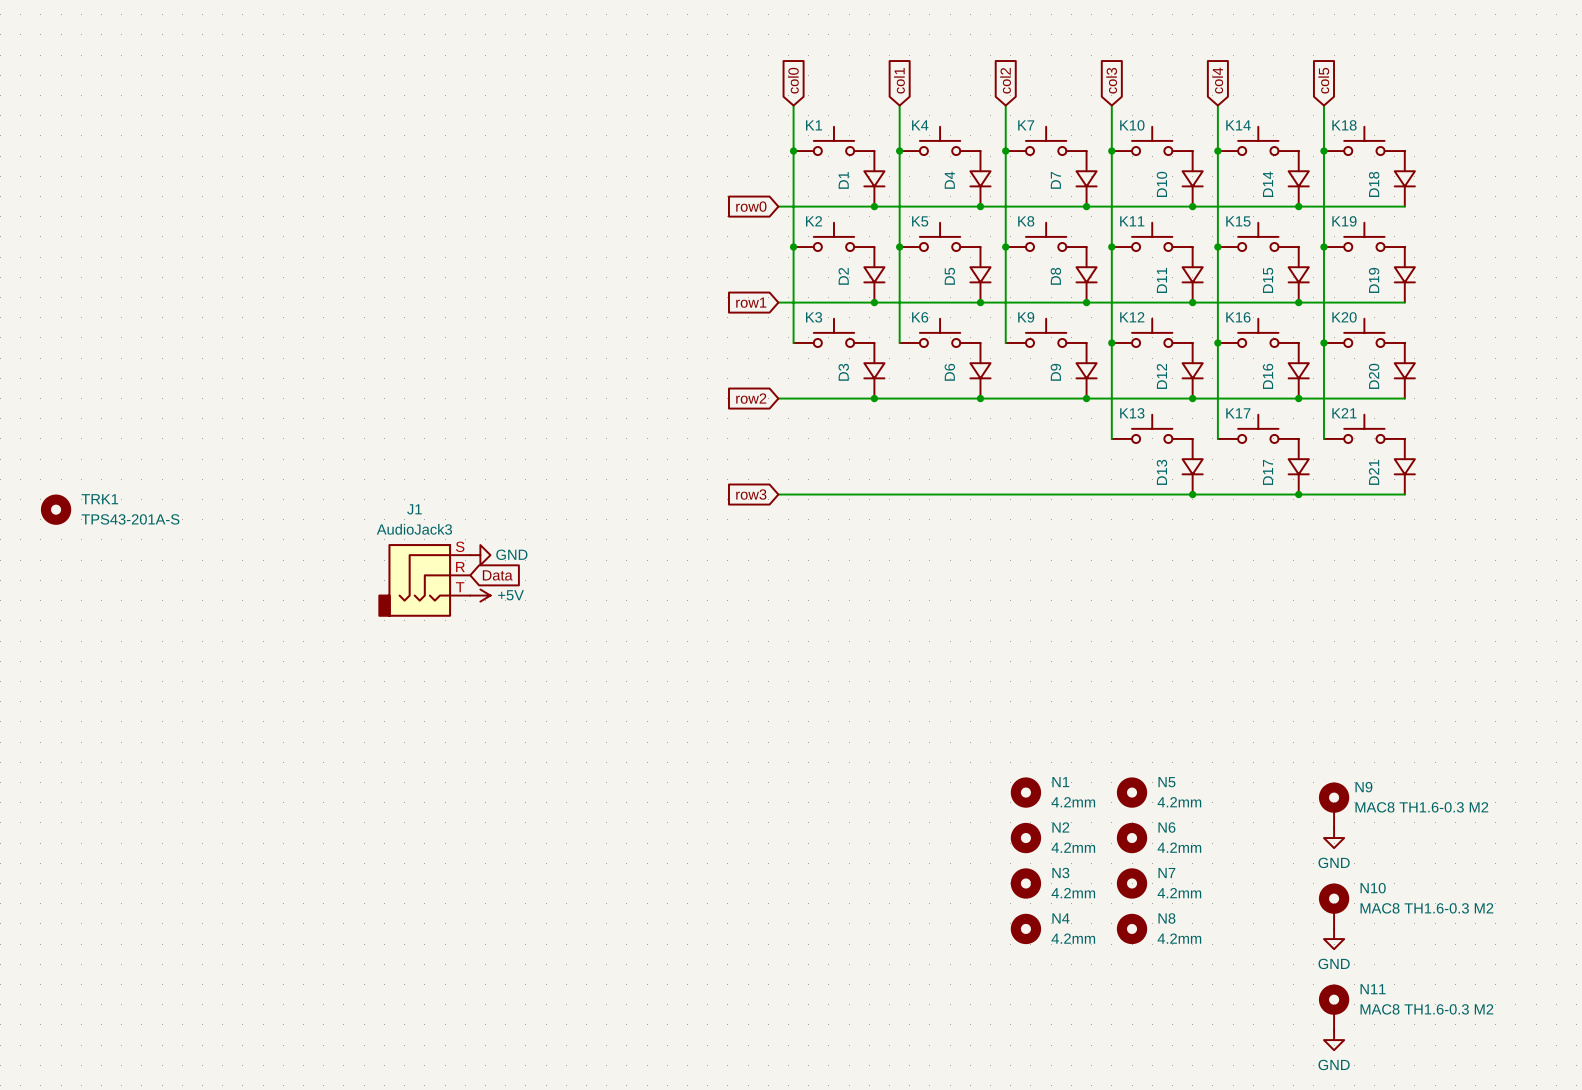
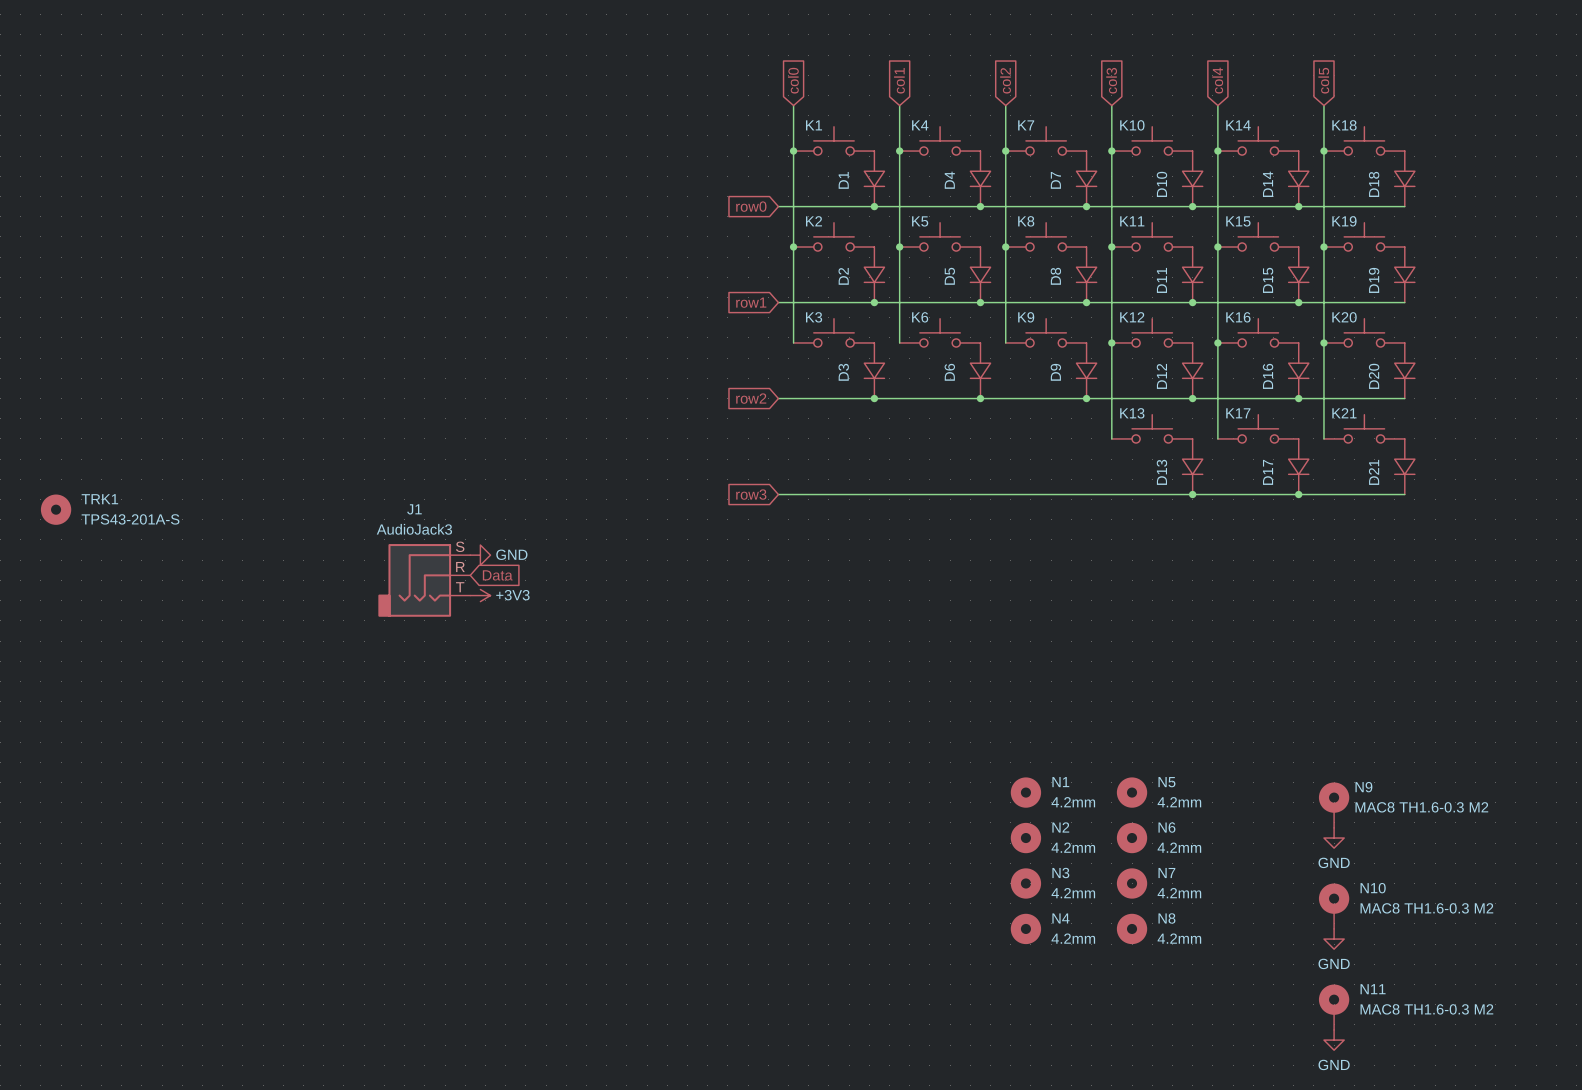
power symbol: +5V (480, 595) -> +3V3 (480, 595)

